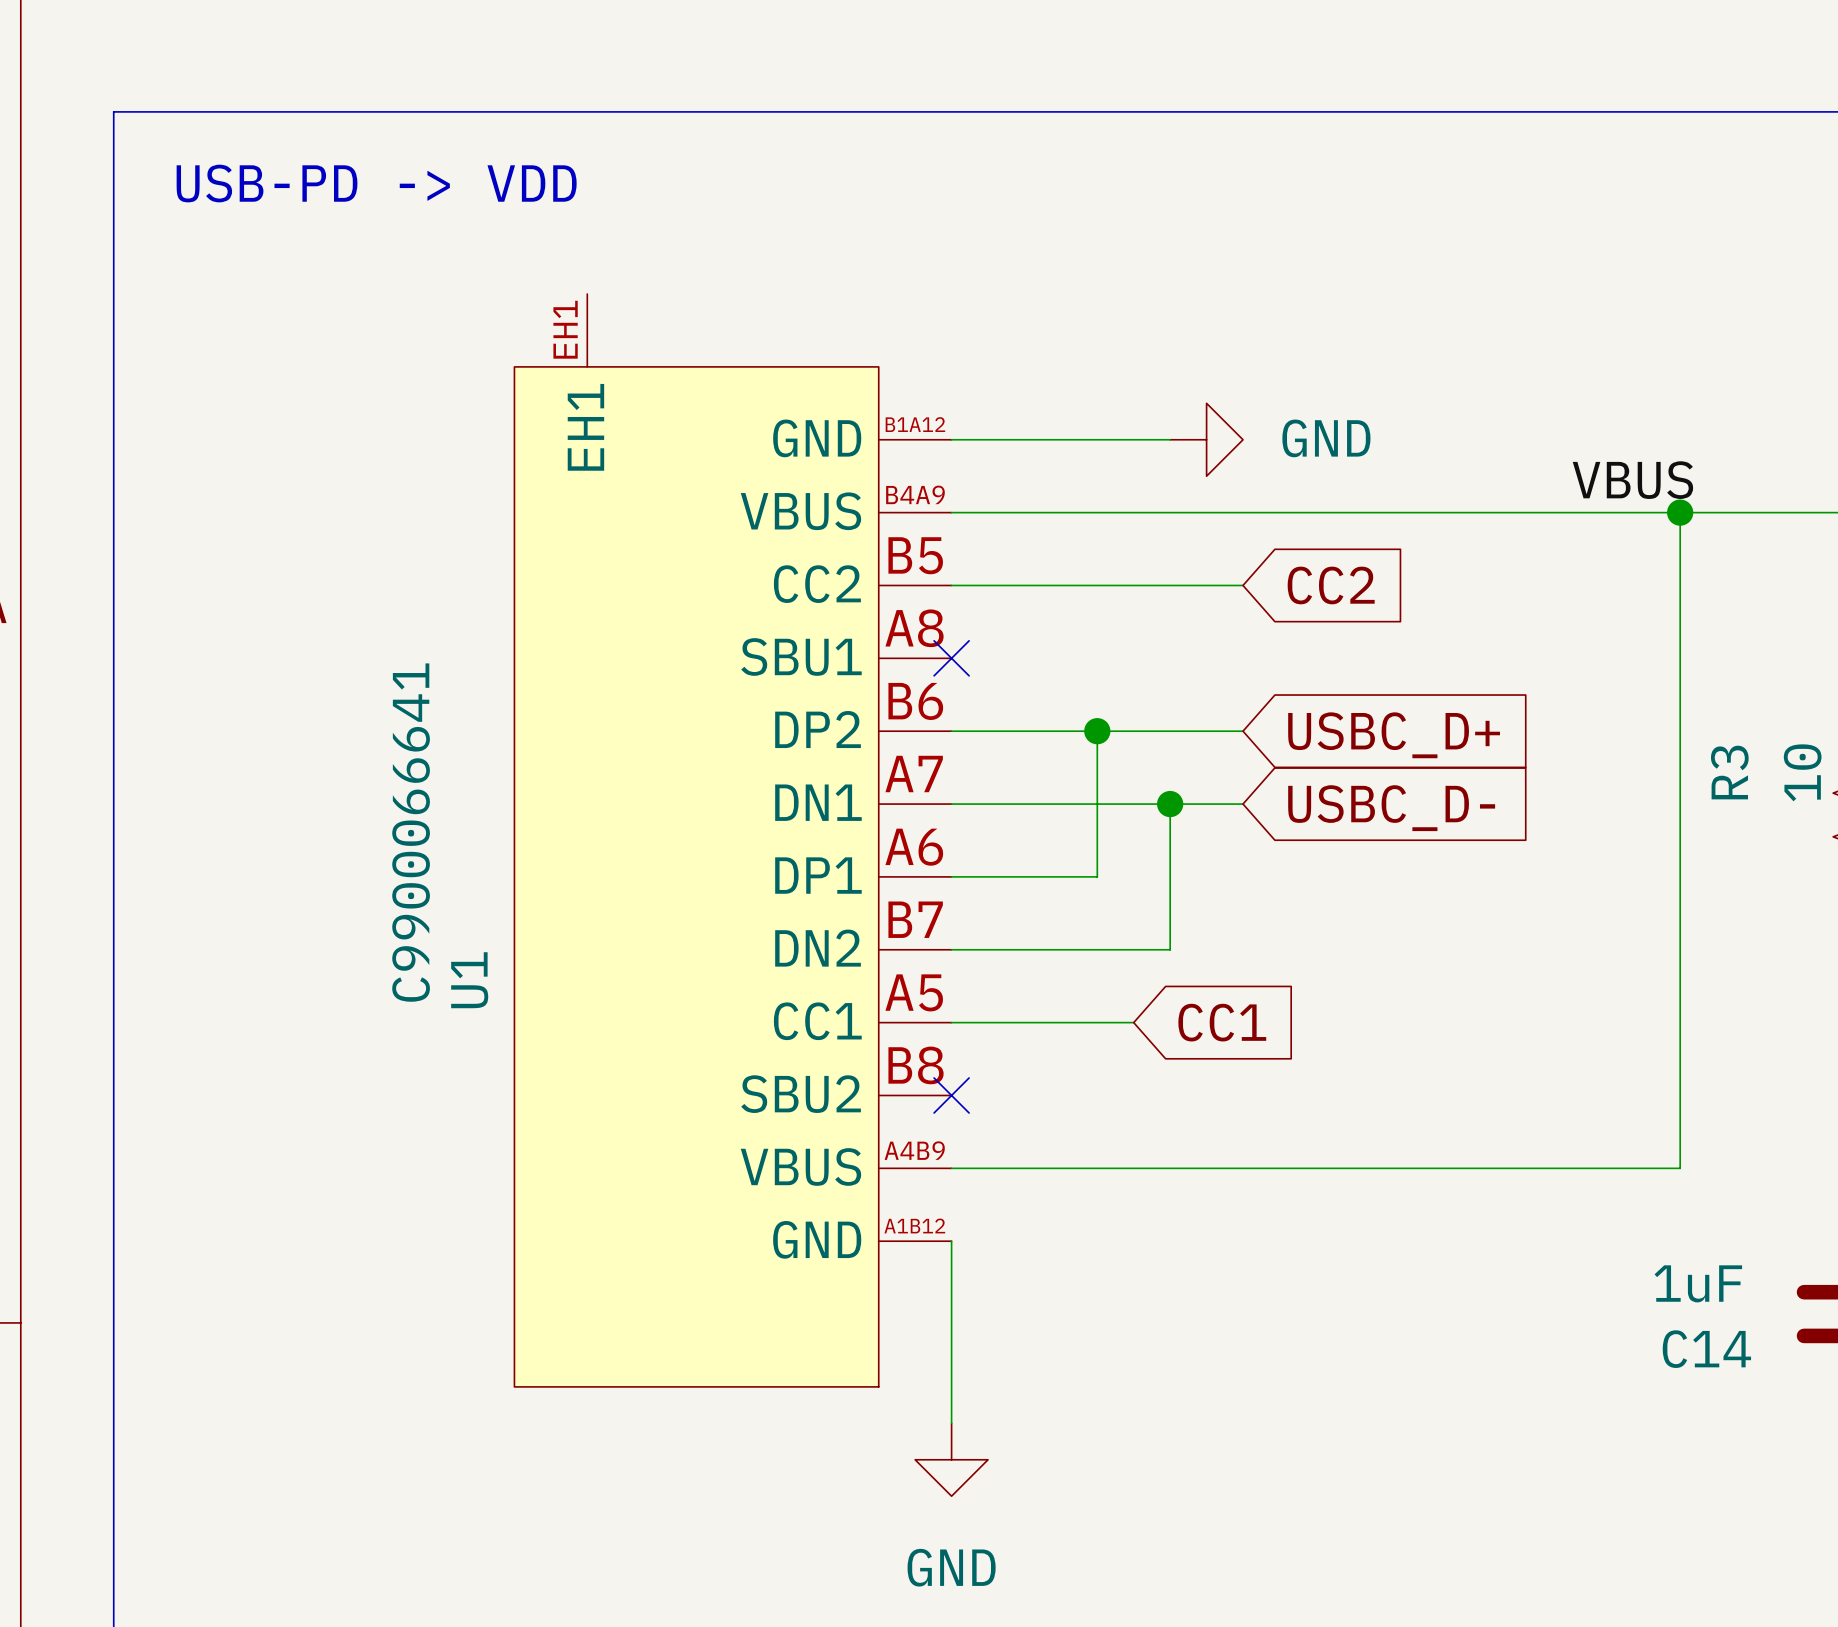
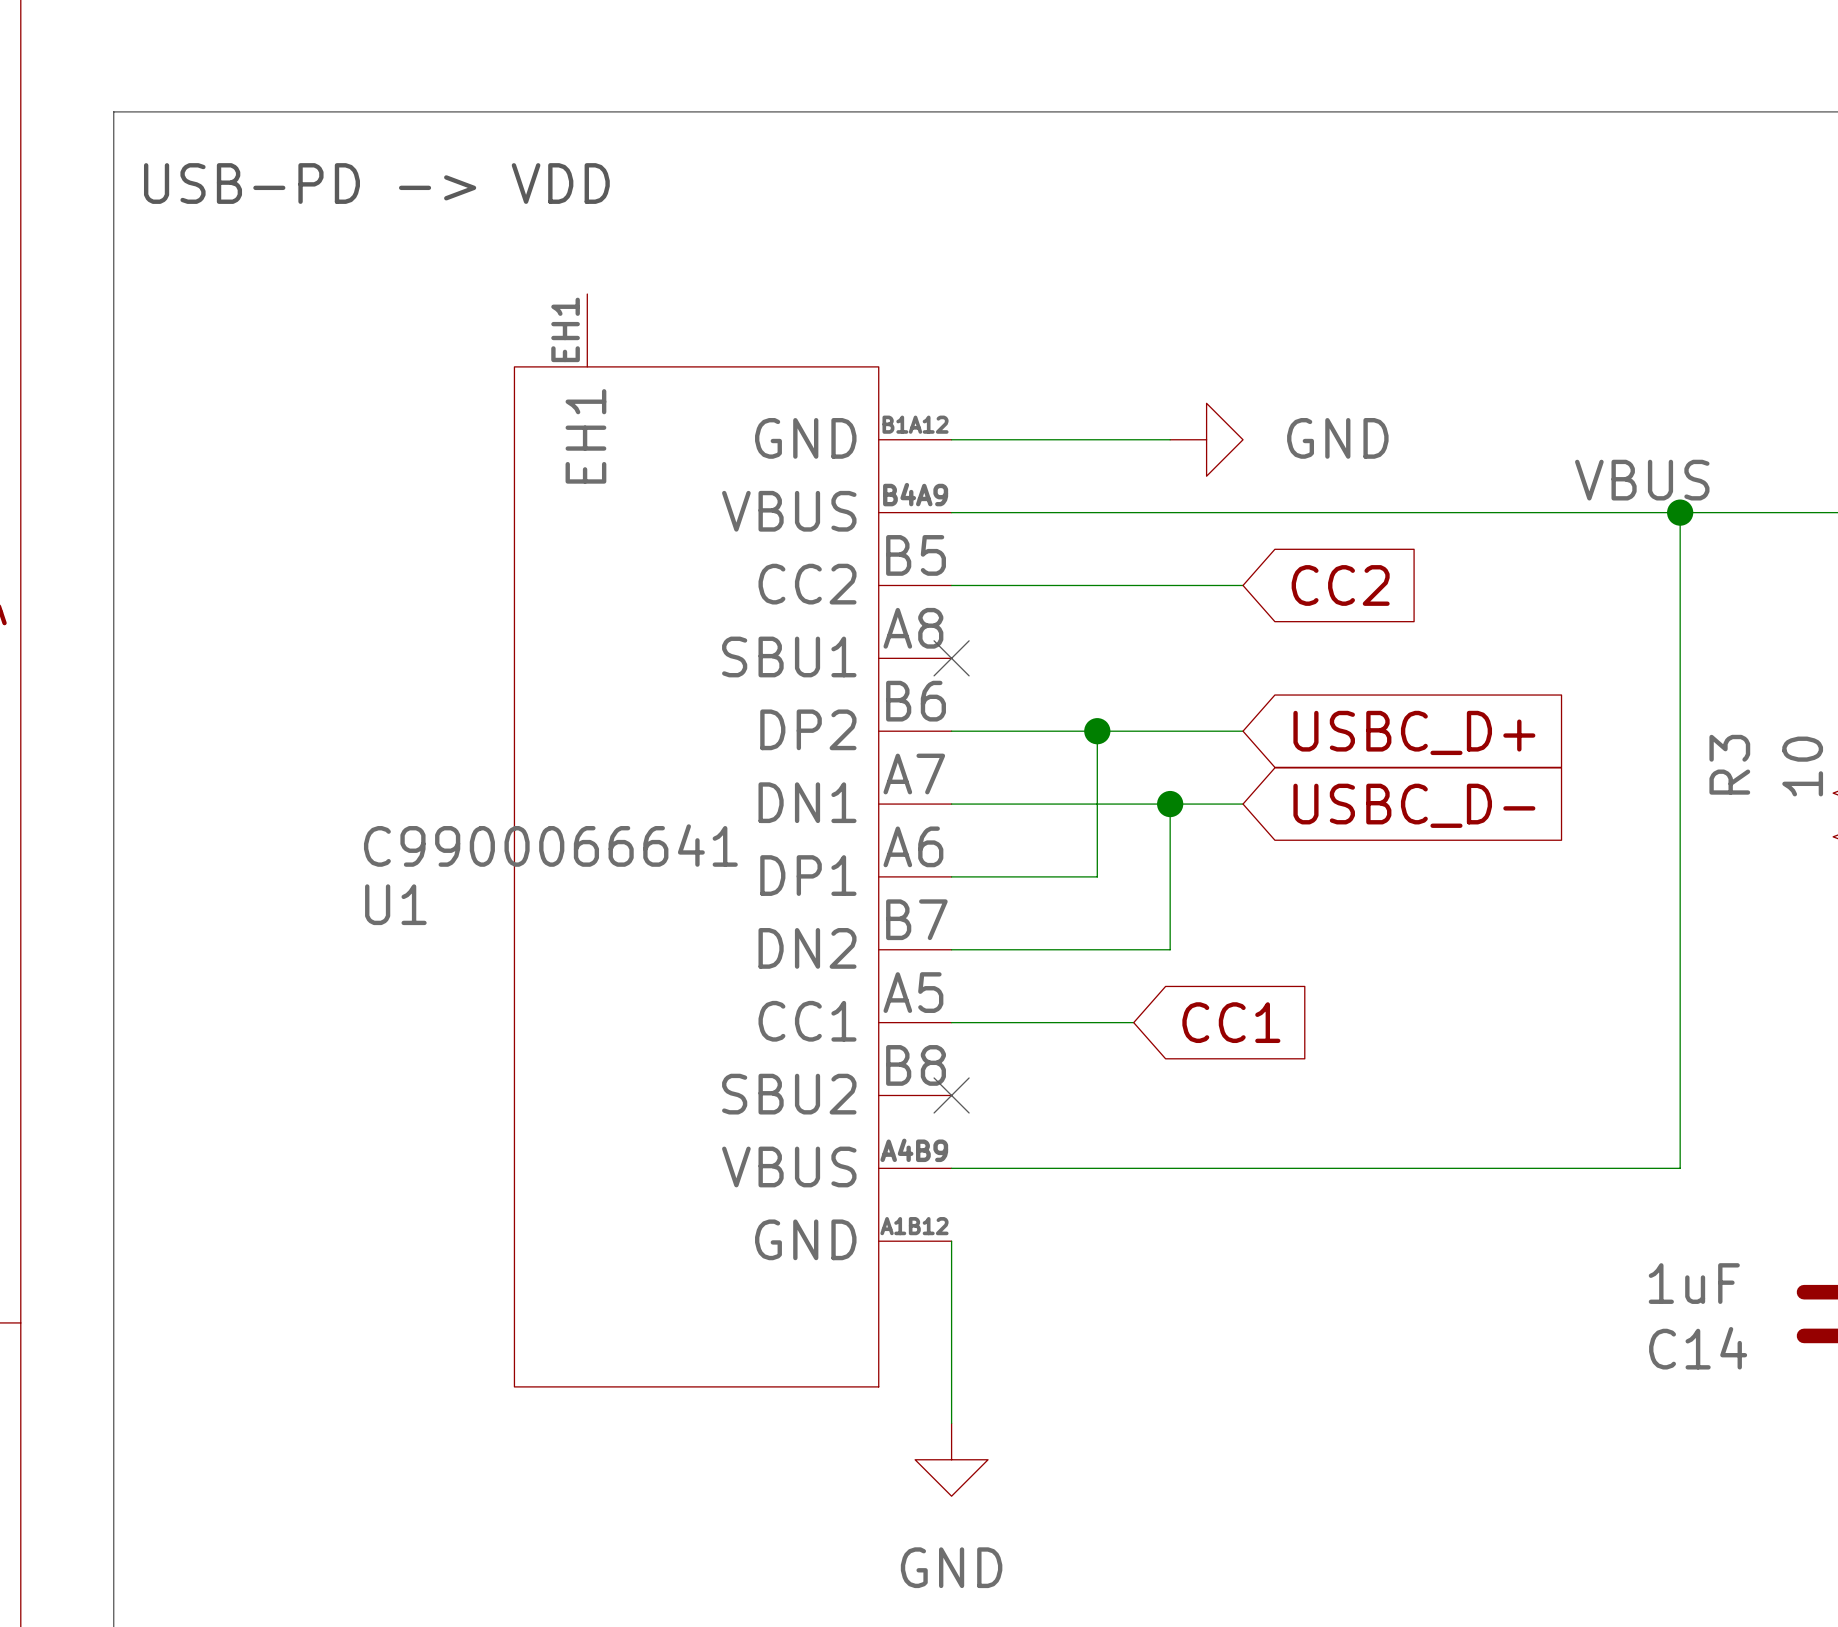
U1 symbol: [514, 294, 952, 1387] -> [514, 294, 952, 1387]
U1 value position: C9900066641 (411, 832) -> C9900066641 (550, 845)
U1 name position: U1 (469, 980) -> U1 (395, 904)

